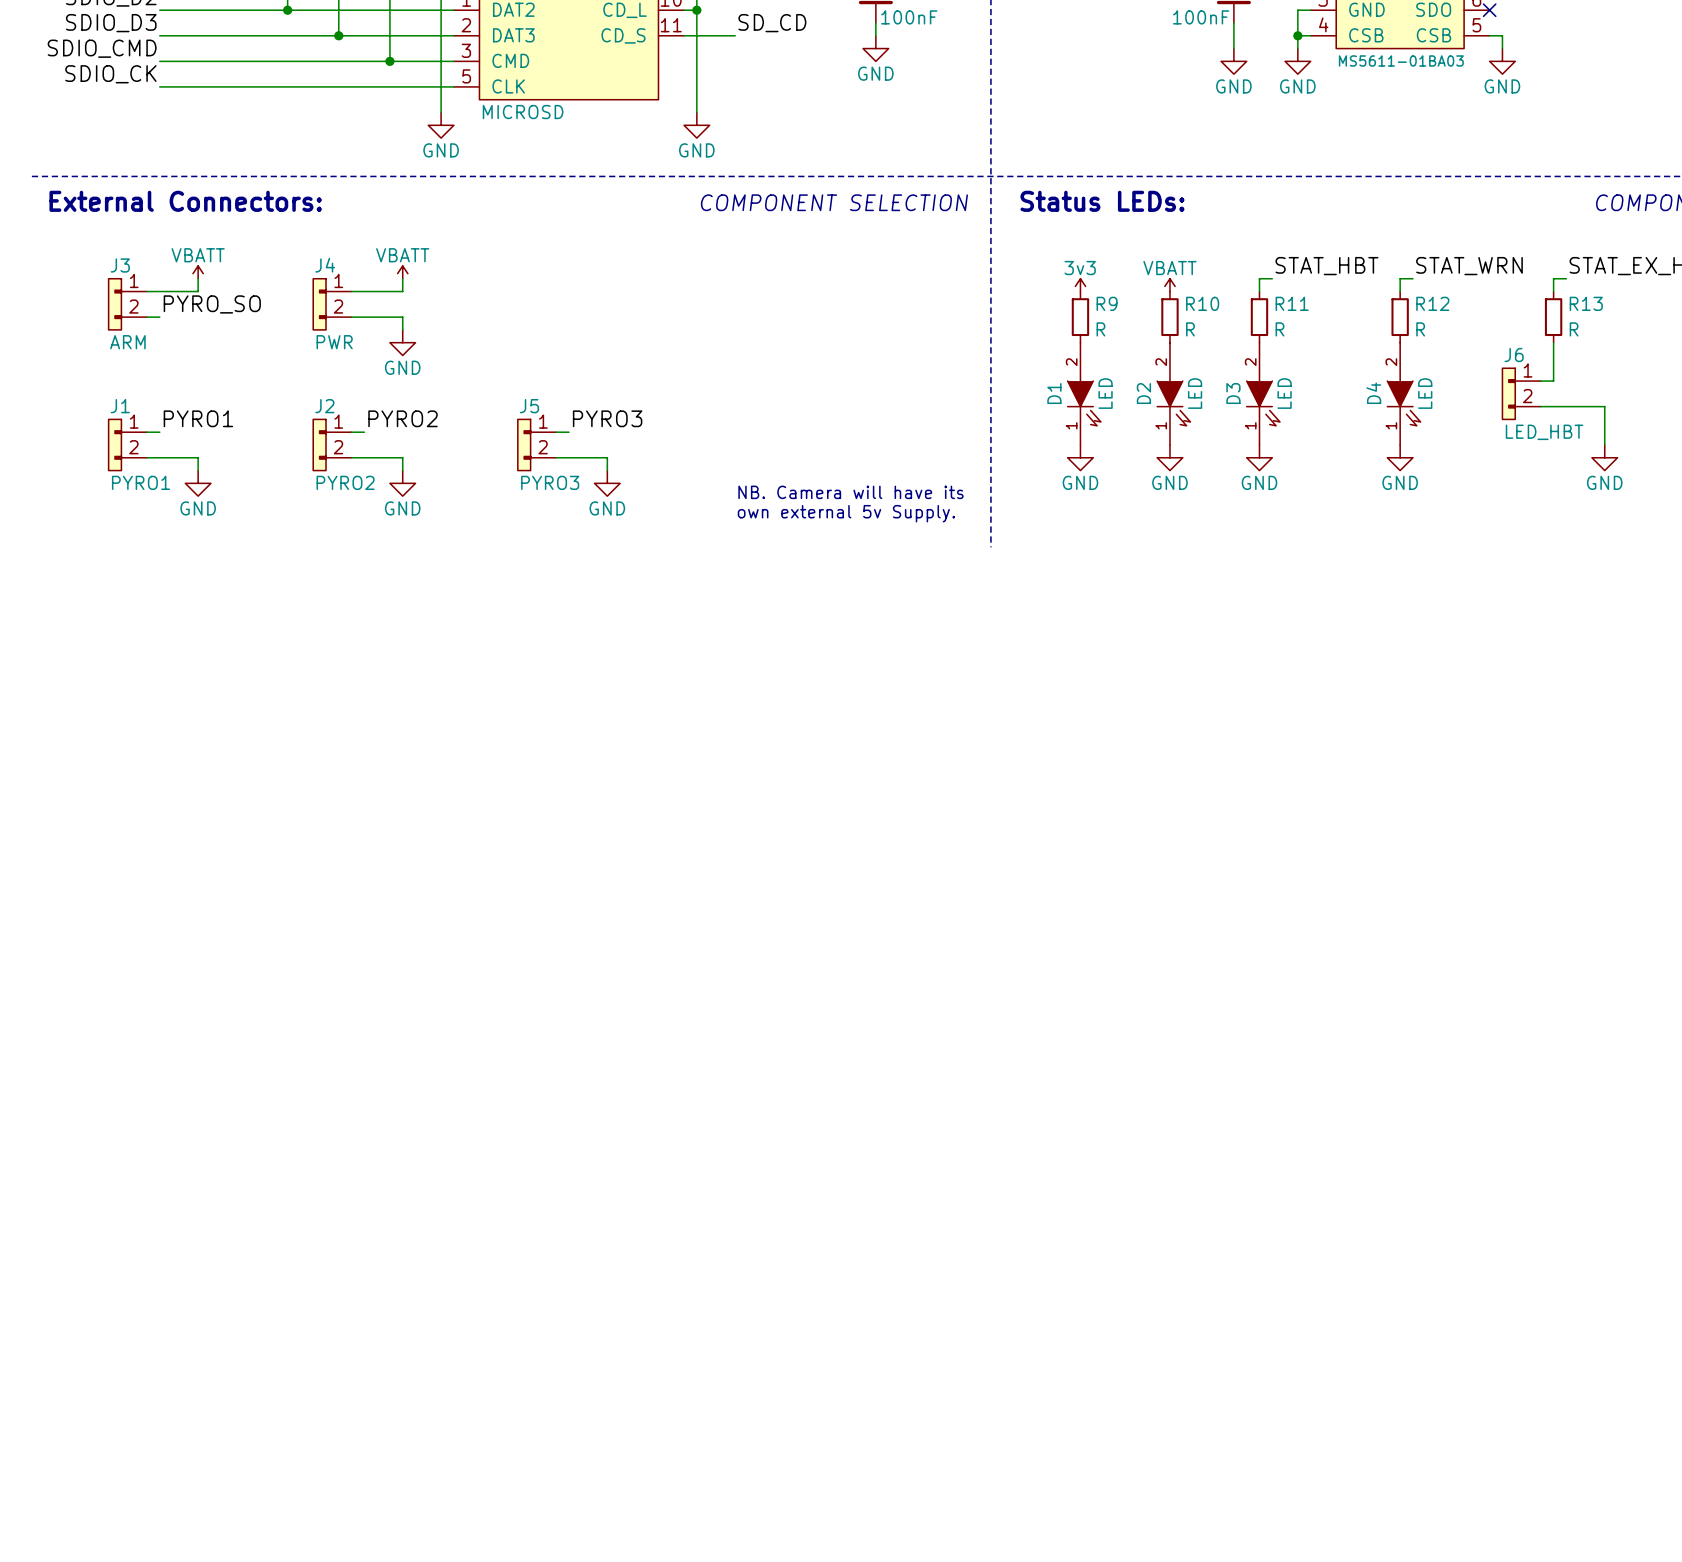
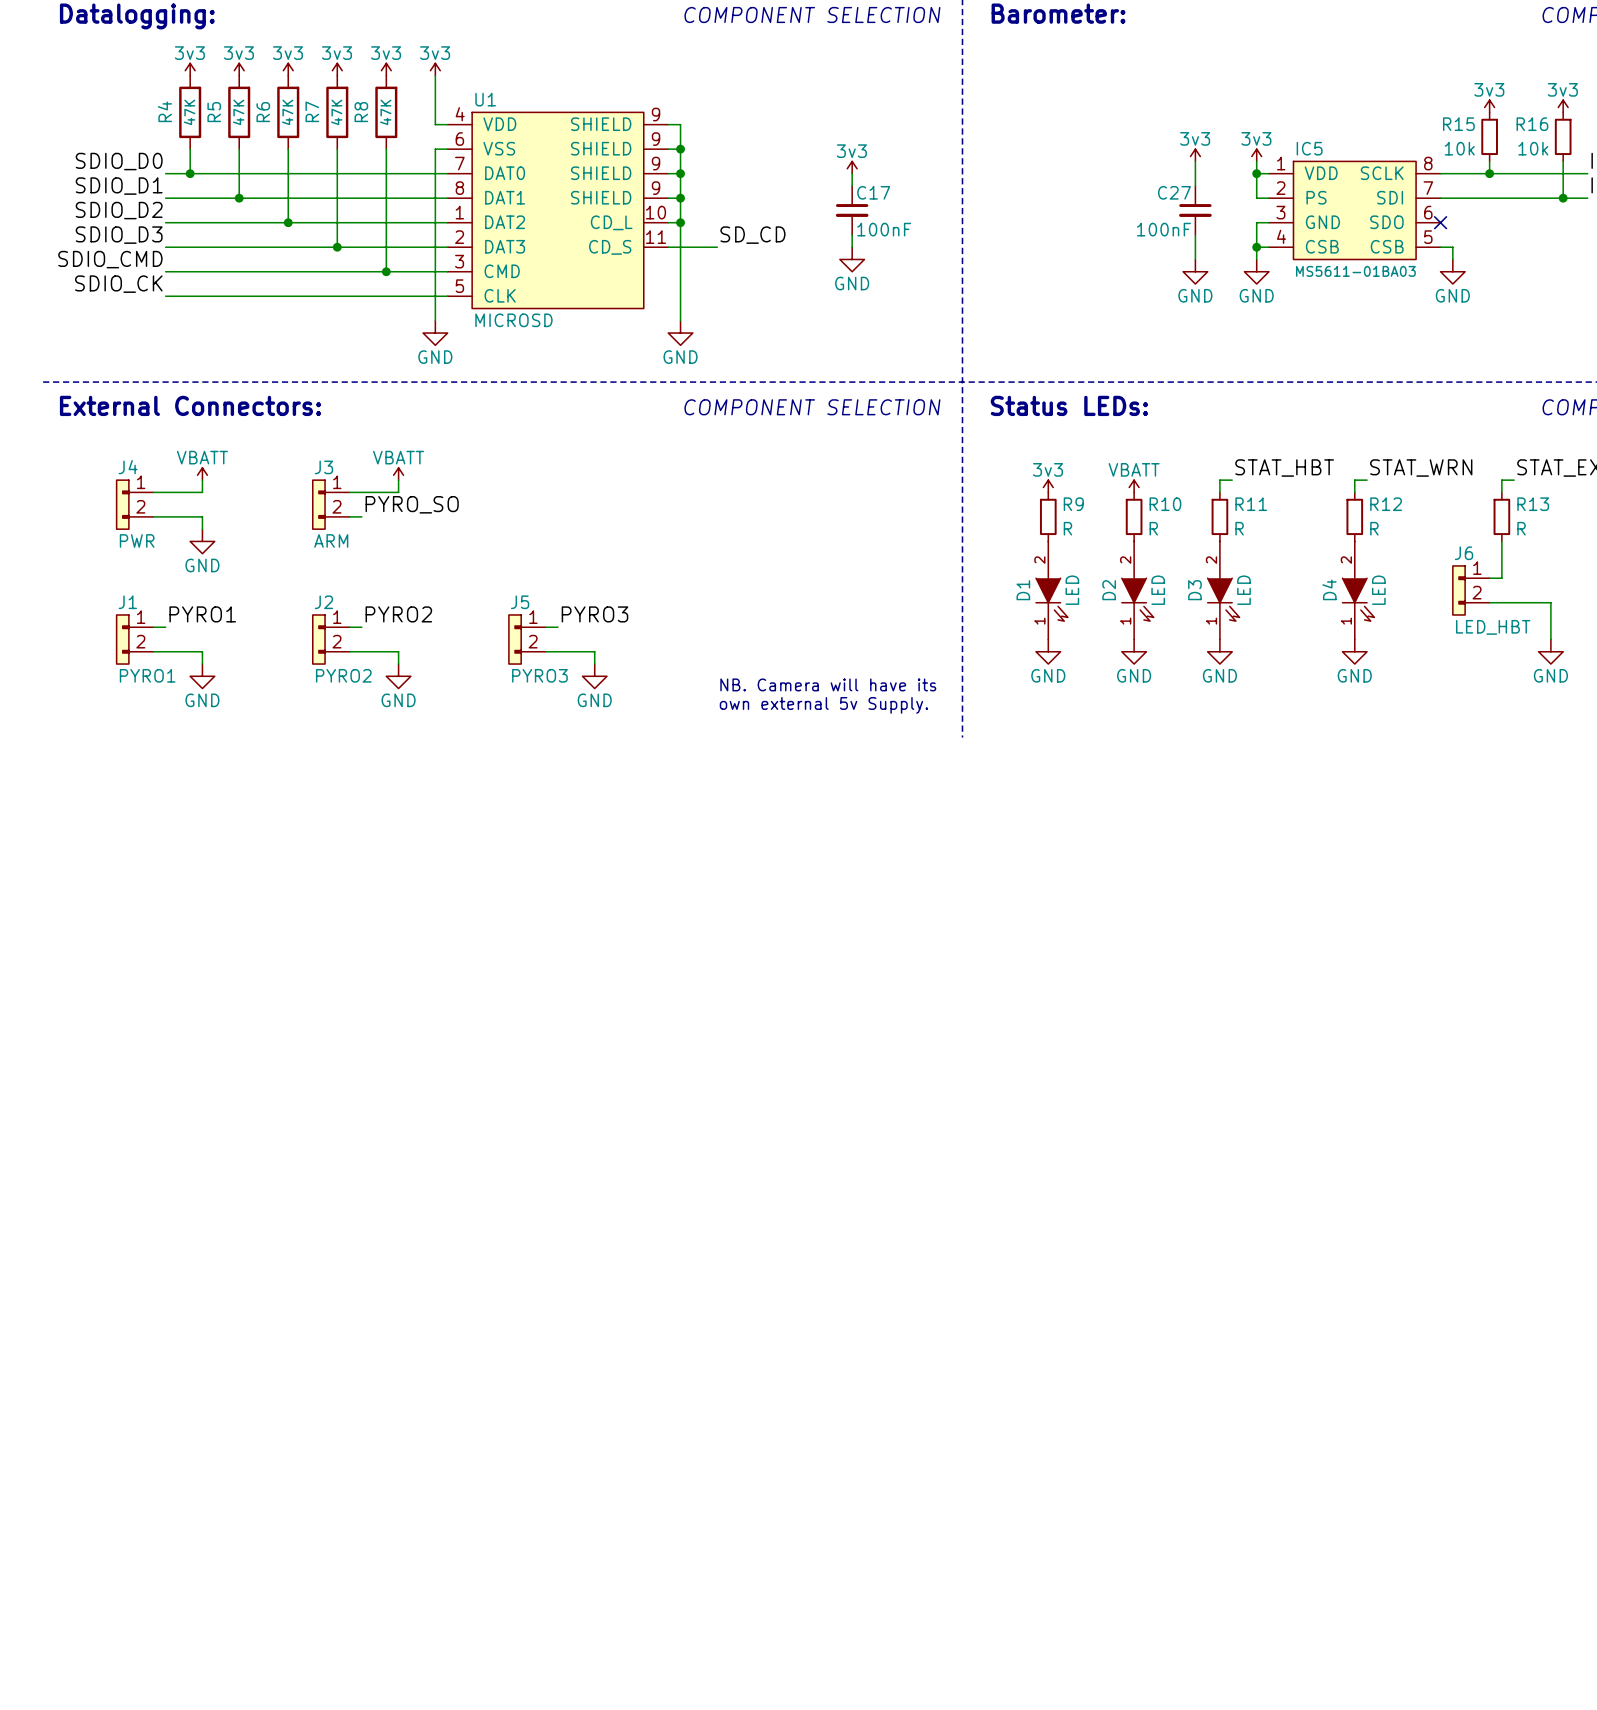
J3 name: J3 (120, 265) -> J4 (128, 467)
J4 name: J4 (325, 265) -> J3 (323, 467)
label position: PYRO_SO (212, 304) -> PYRO_SO (412, 504)
wire: (364, 317) (402, 317) (402, 329) -> (165, 516) (202, 516) (202, 529)
J3 value: ARM (127, 342) -> PWR (137, 540)
J4 value: PWR (334, 342) -> ARM (331, 540)
power symbol position: GND (402, 342) -> GND (202, 541)

